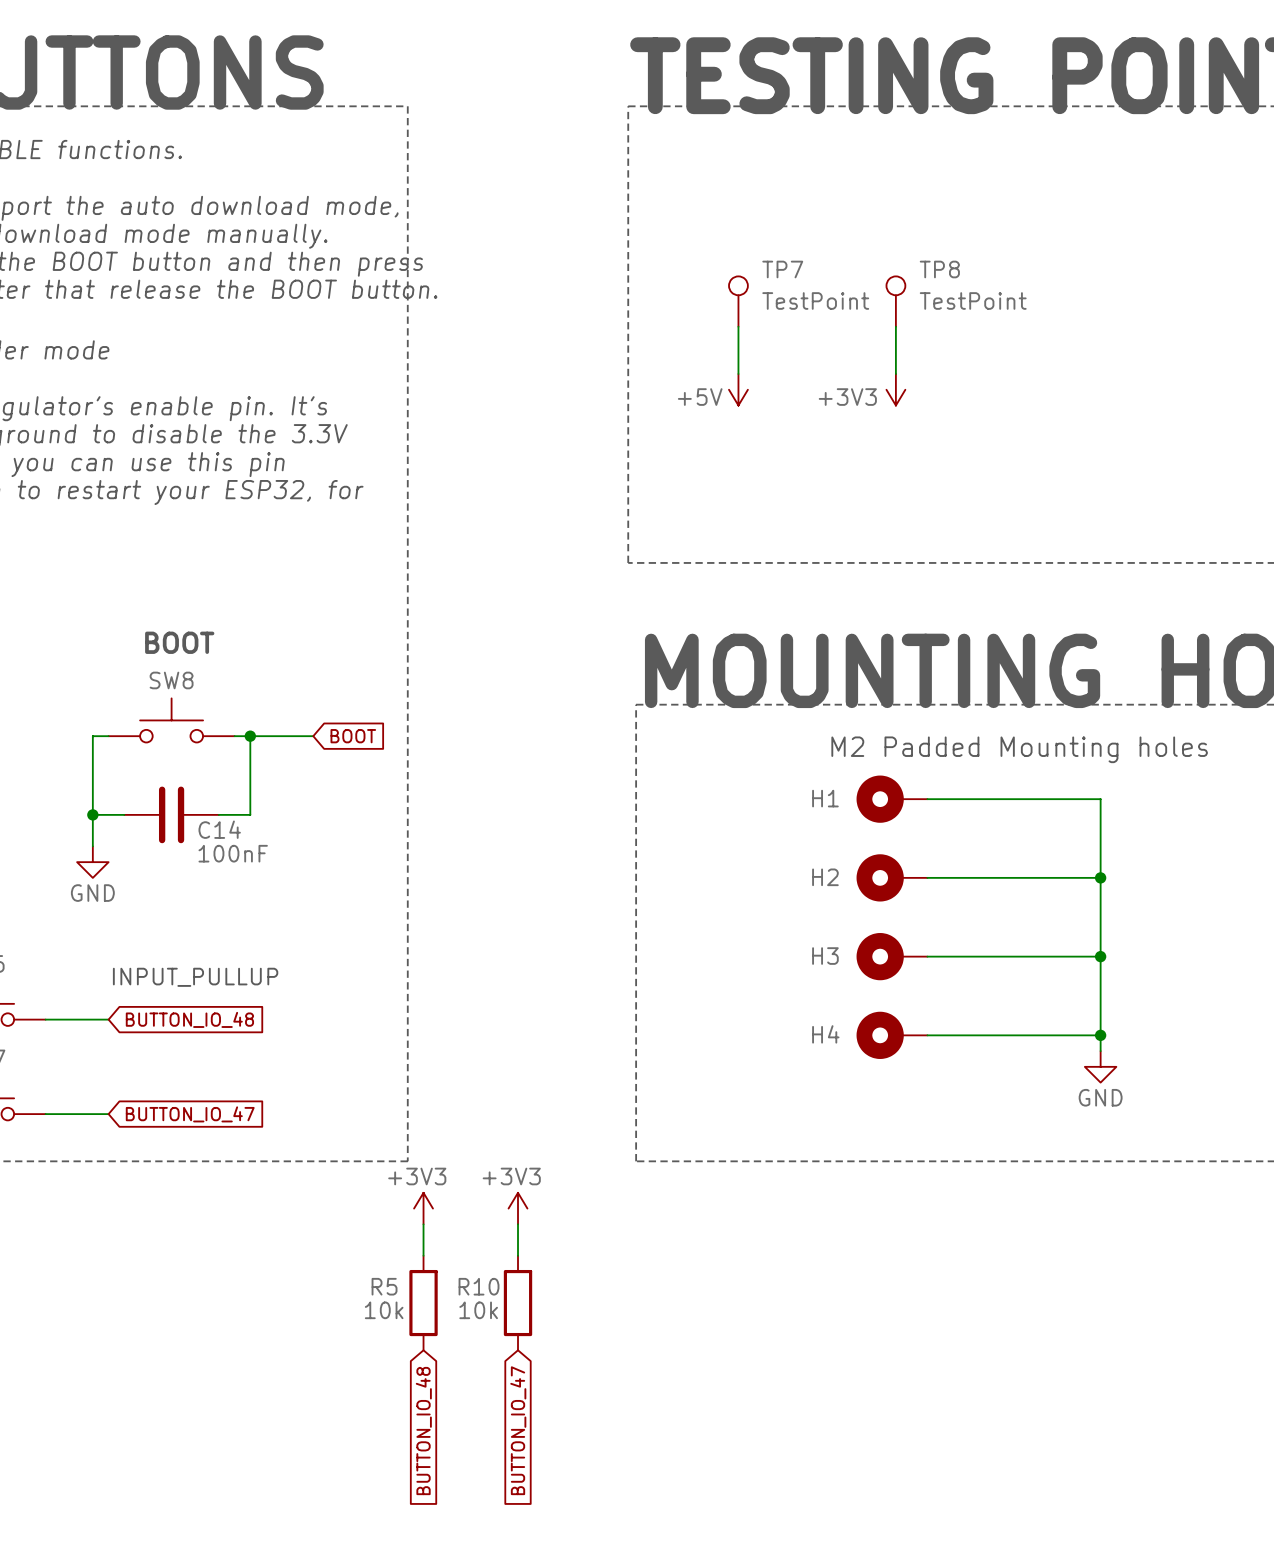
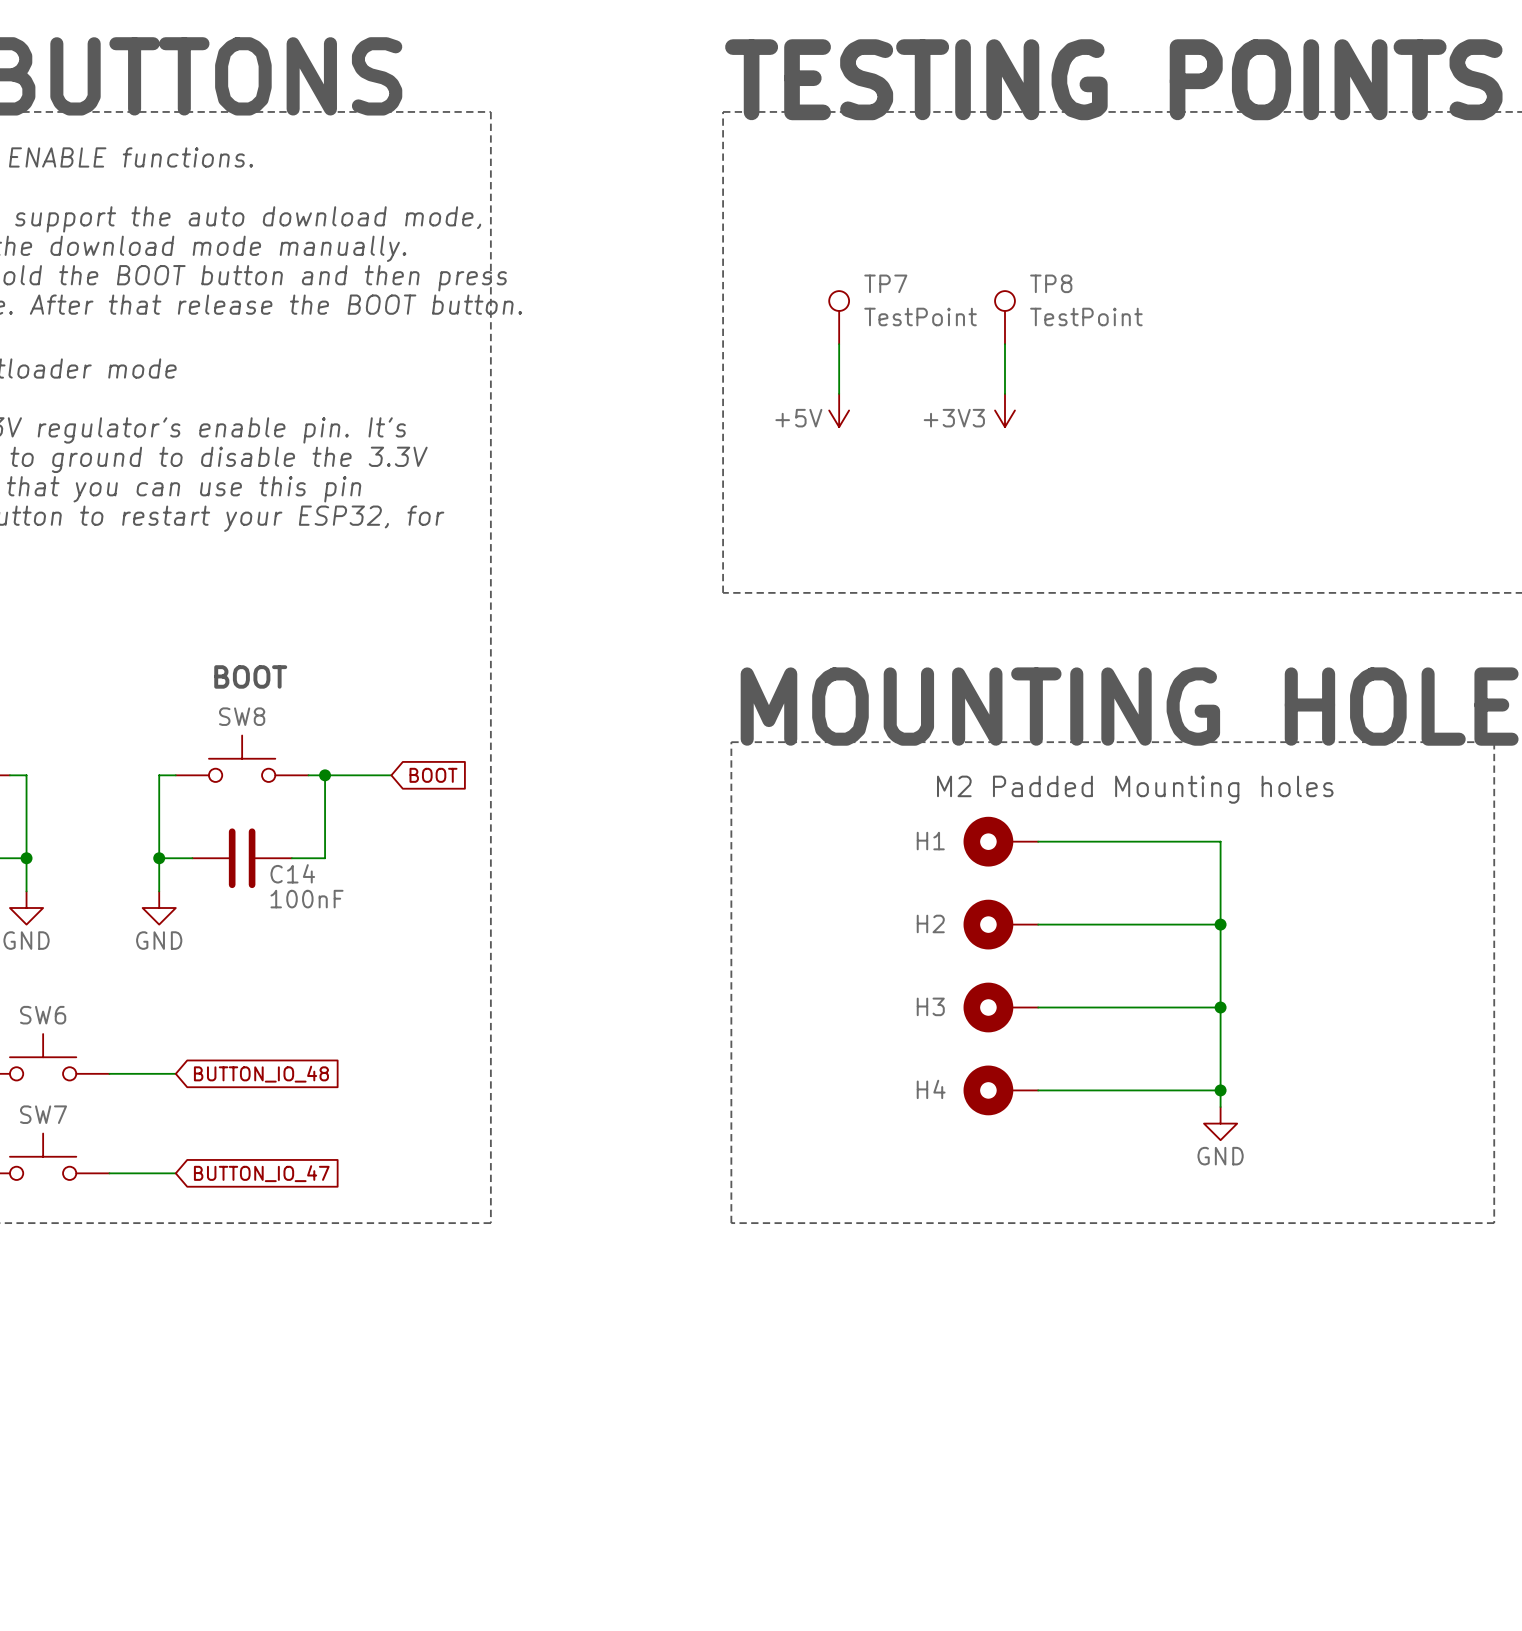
text: INPUT_PULLUP (195, 977) -> none
power symbol: +3V3 (423, 1208) -> none
power symbol: +3V3 (518, 1208) -> none
wire: (423, 1224) (423, 1255) -> none
wire: (518, 1224) (518, 1255) -> none
R5: 10k (423, 1303) -> none
R10: 10k (518, 1303) -> none
global label: BUTTON_IO_47 (518, 1430) -> none
global label: BUTTON_IO_48 (423, 1431) -> none

